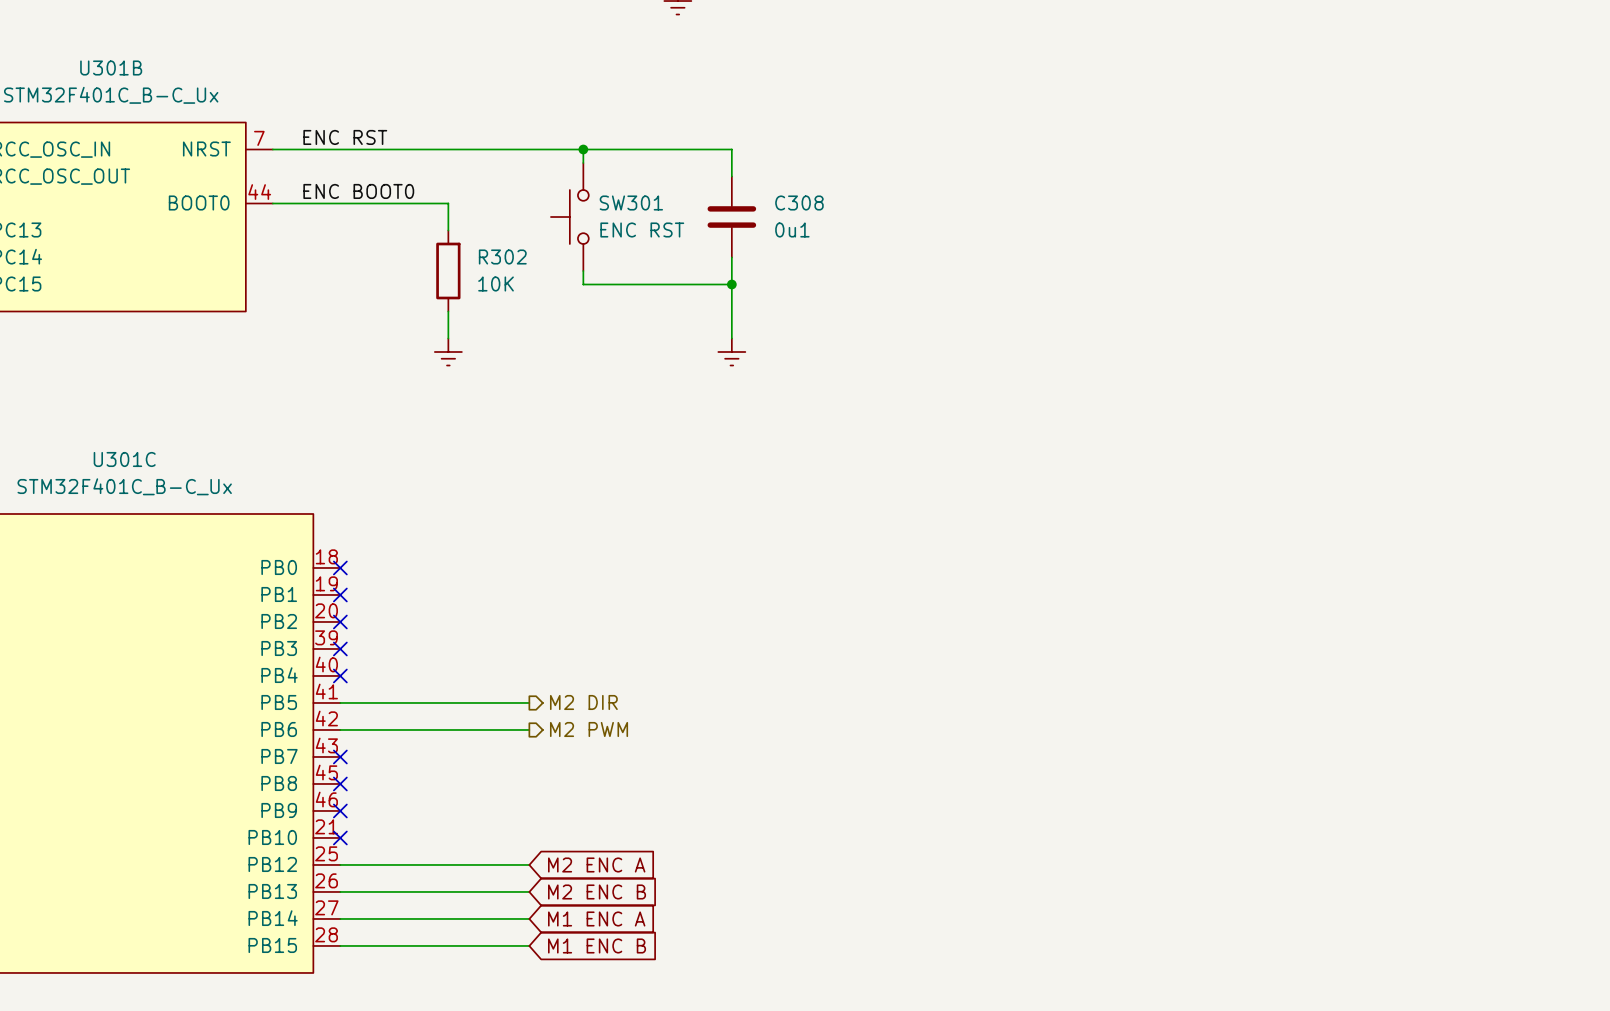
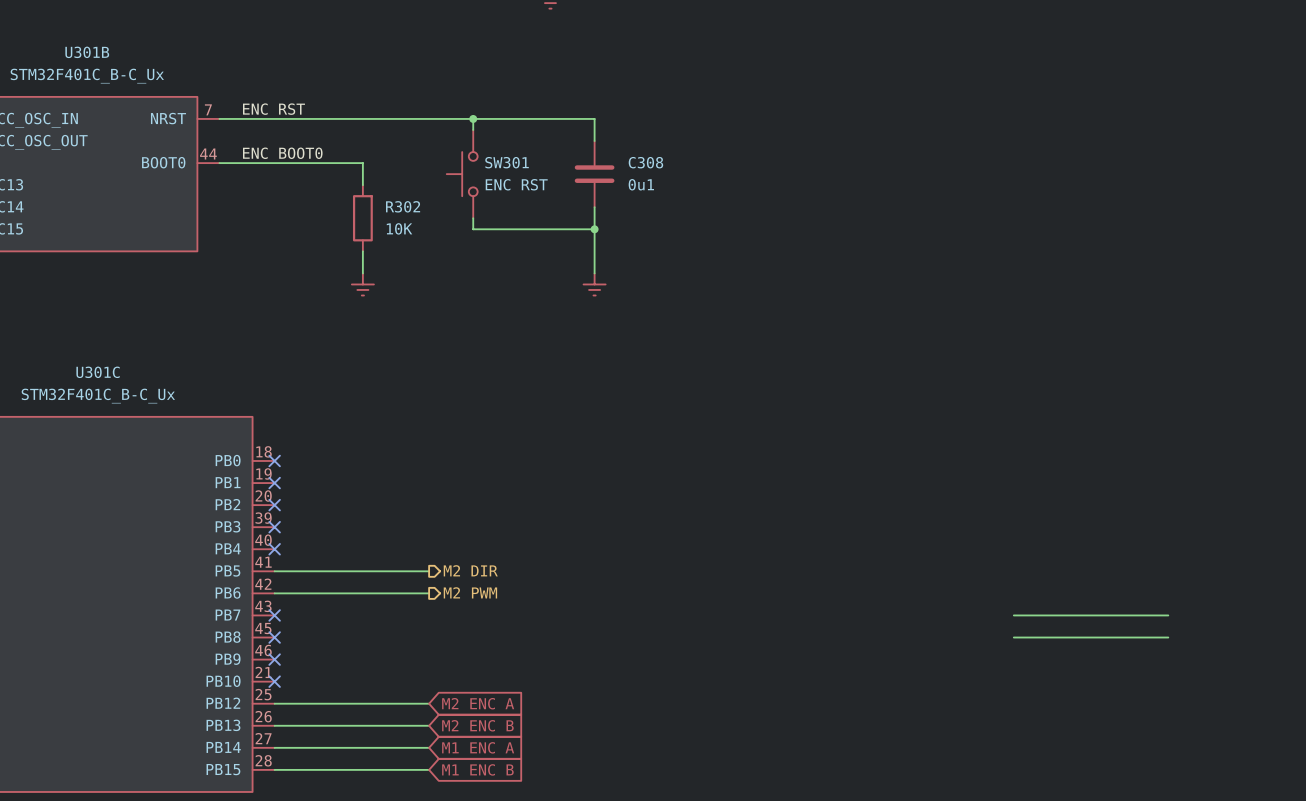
wire: none -> (1013, 615) (1168, 615)
wire: none -> (1013, 637) (1168, 637)

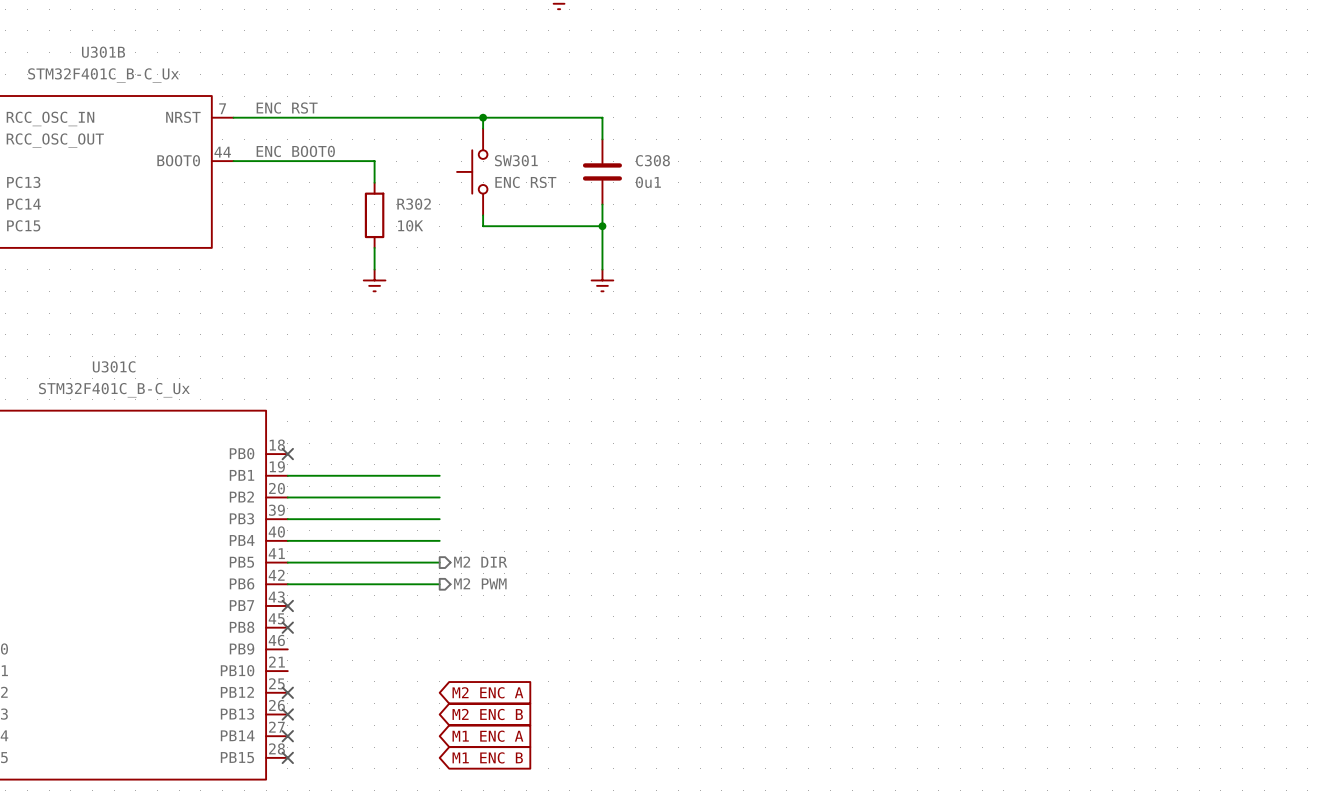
wire: none -> (287, 475) (439, 475)
no-connect mark: (274, 483) -> none
no-connect mark: (274, 505) -> none
no-connect mark: (274, 527) -> none
no-connect mark: (274, 549) -> none
wire: (1013, 615) (1168, 615) -> none
wire: (1013, 637) (1168, 637) -> none
no-connect mark: (274, 659) -> none
no-connect mark: (274, 681) -> none
wire: (274, 703) (429, 703) -> (287, 497) (439, 497)
no-connect mark: none -> (287, 692)
wire: (274, 725) (429, 725) -> (287, 519) (439, 519)
no-connect mark: none -> (287, 714)
wire: (274, 747) (429, 747) -> (287, 540) (439, 540)
no-connect mark: none -> (287, 736)
wire: (274, 769) (429, 769) -> none
no-connect mark: none -> (287, 757)

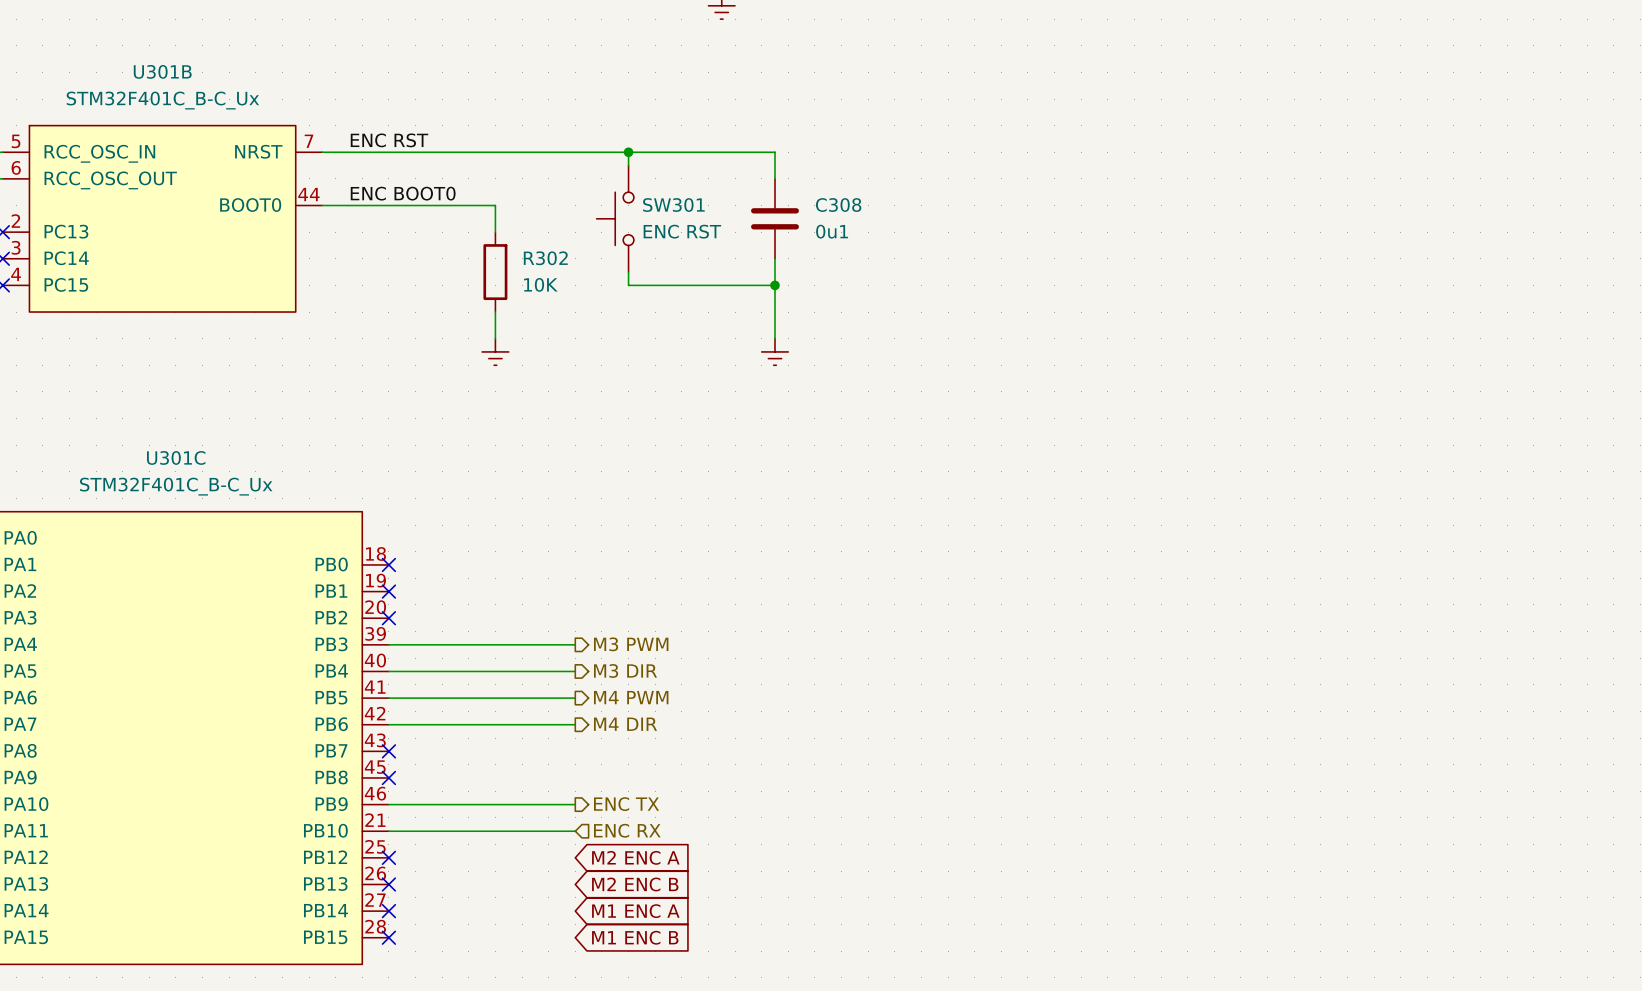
wire: (287, 475) (439, 475) -> (388, 804) (575, 804)
no-connect mark: none -> (388, 591)
wire: (287, 497) (439, 497) -> (388, 831) (575, 831)
no-connect mark: none -> (388, 618)
hierarchical label: none -> M3 PWM (631, 644)
hierarchical label: none -> M3 DIR (625, 670)
hierarchical label: M2 DIR (480, 562) -> M4 PWM (631, 697)
hierarchical label: M2 PWM (480, 583) -> M4 DIR (625, 724)
hierarchical label: none -> ENC TX (626, 804)
hierarchical label: none -> ENC RX (627, 830)

